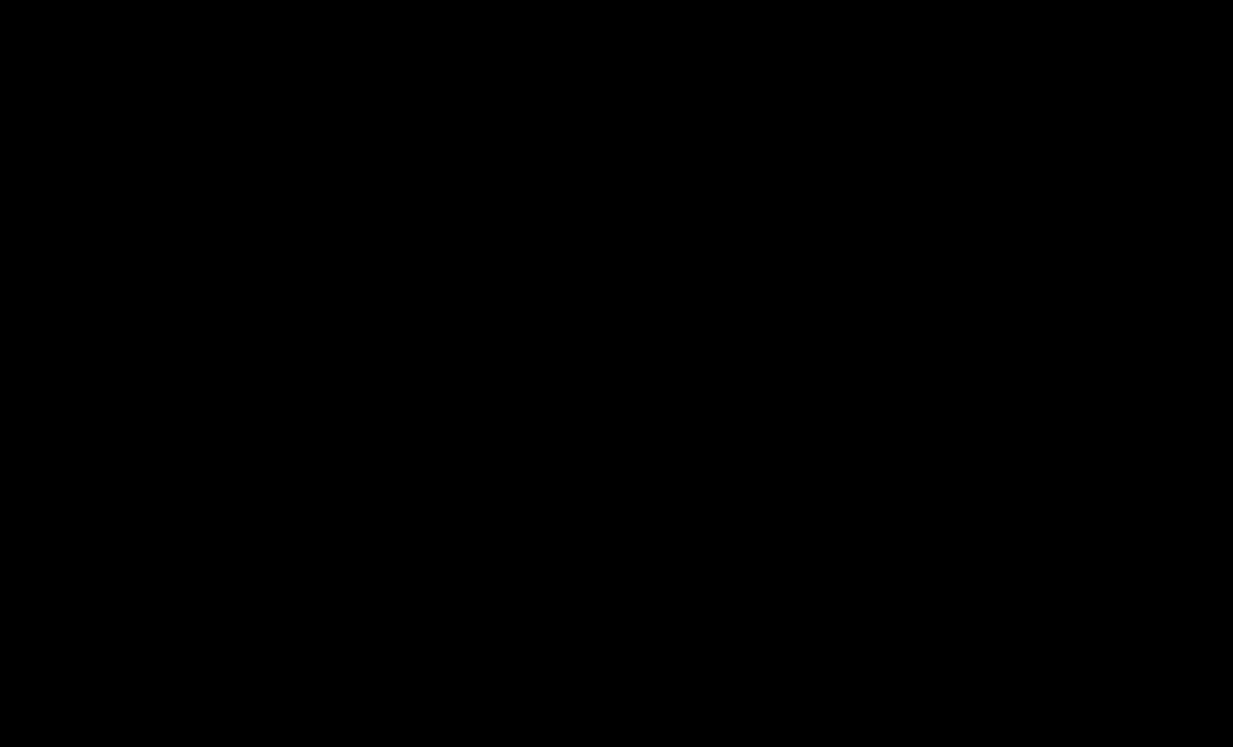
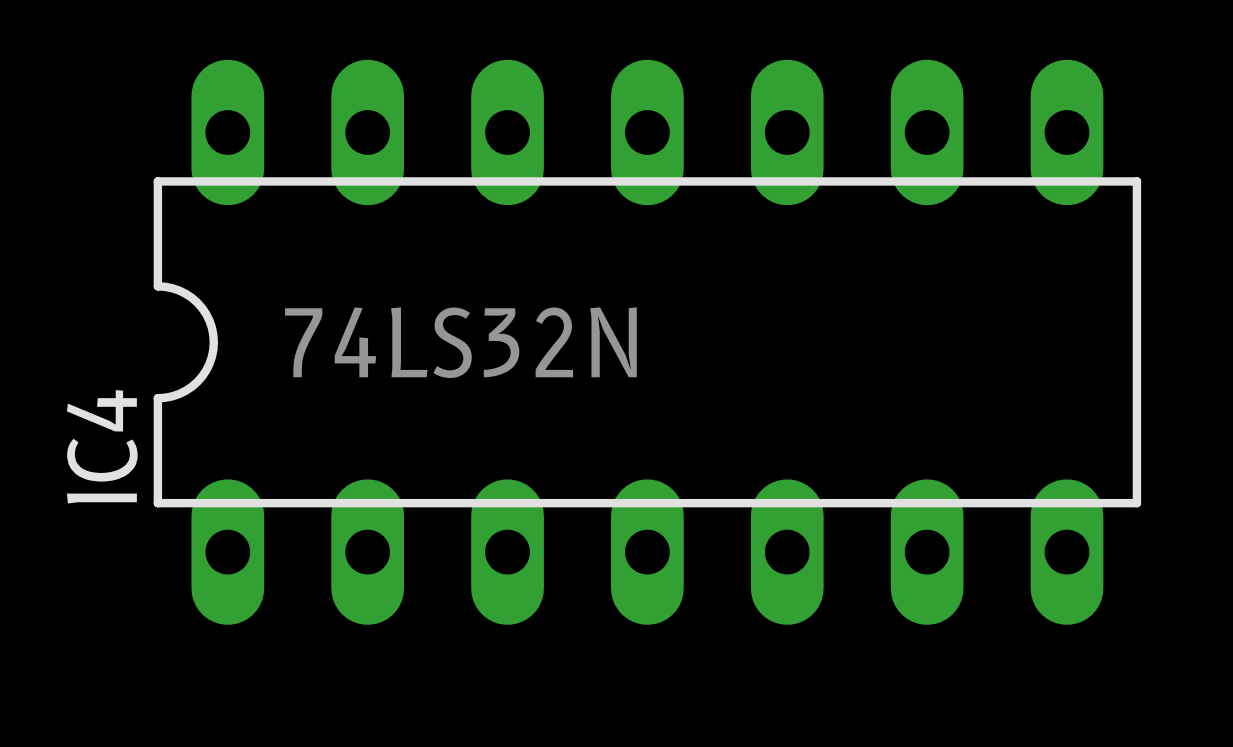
IC4: none -> 74LS32N (647, 342)

